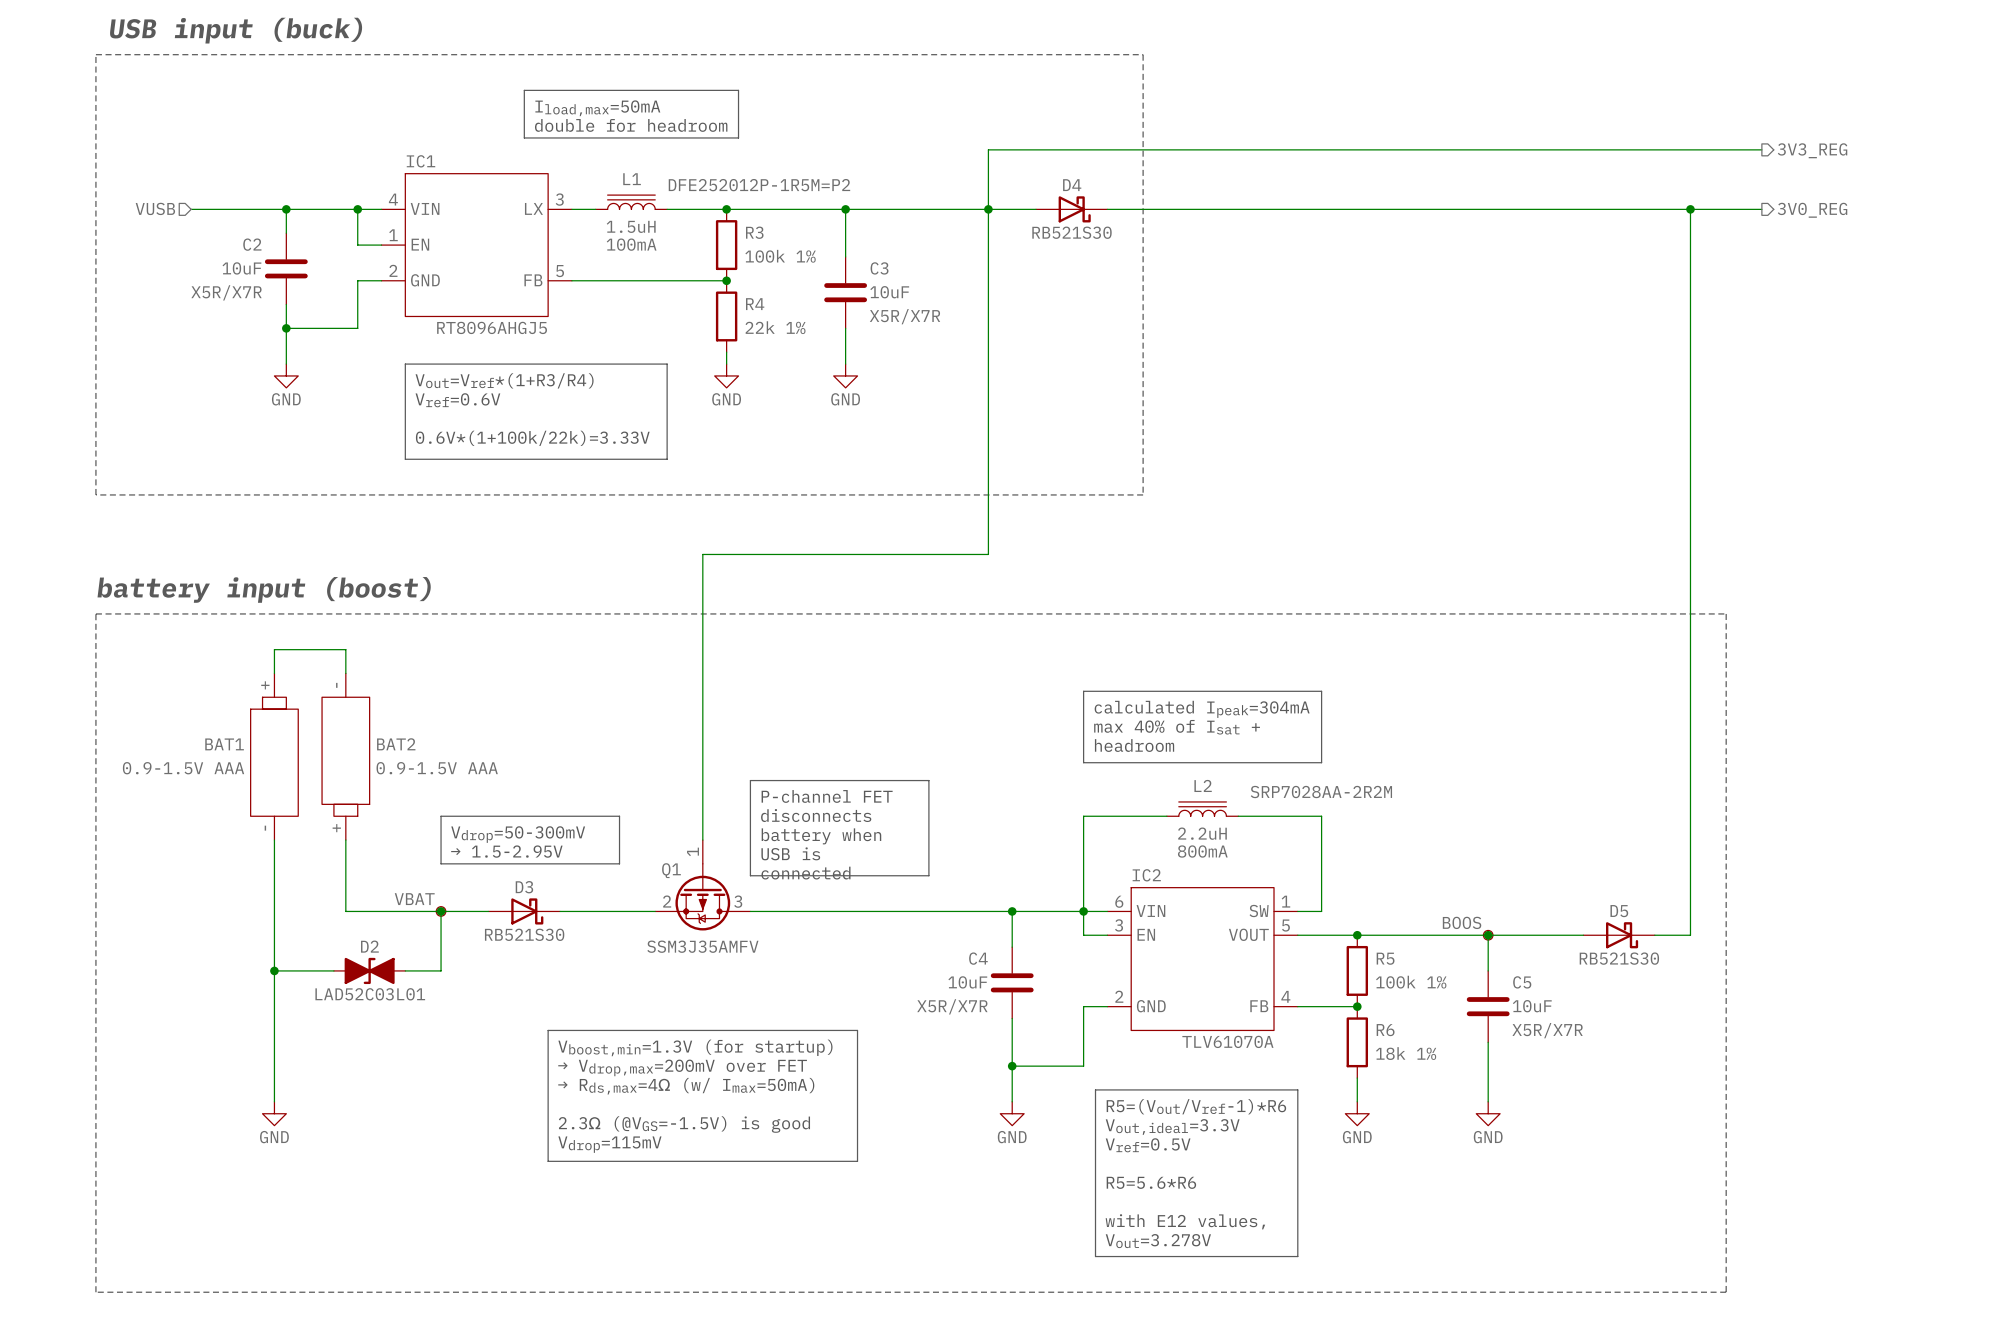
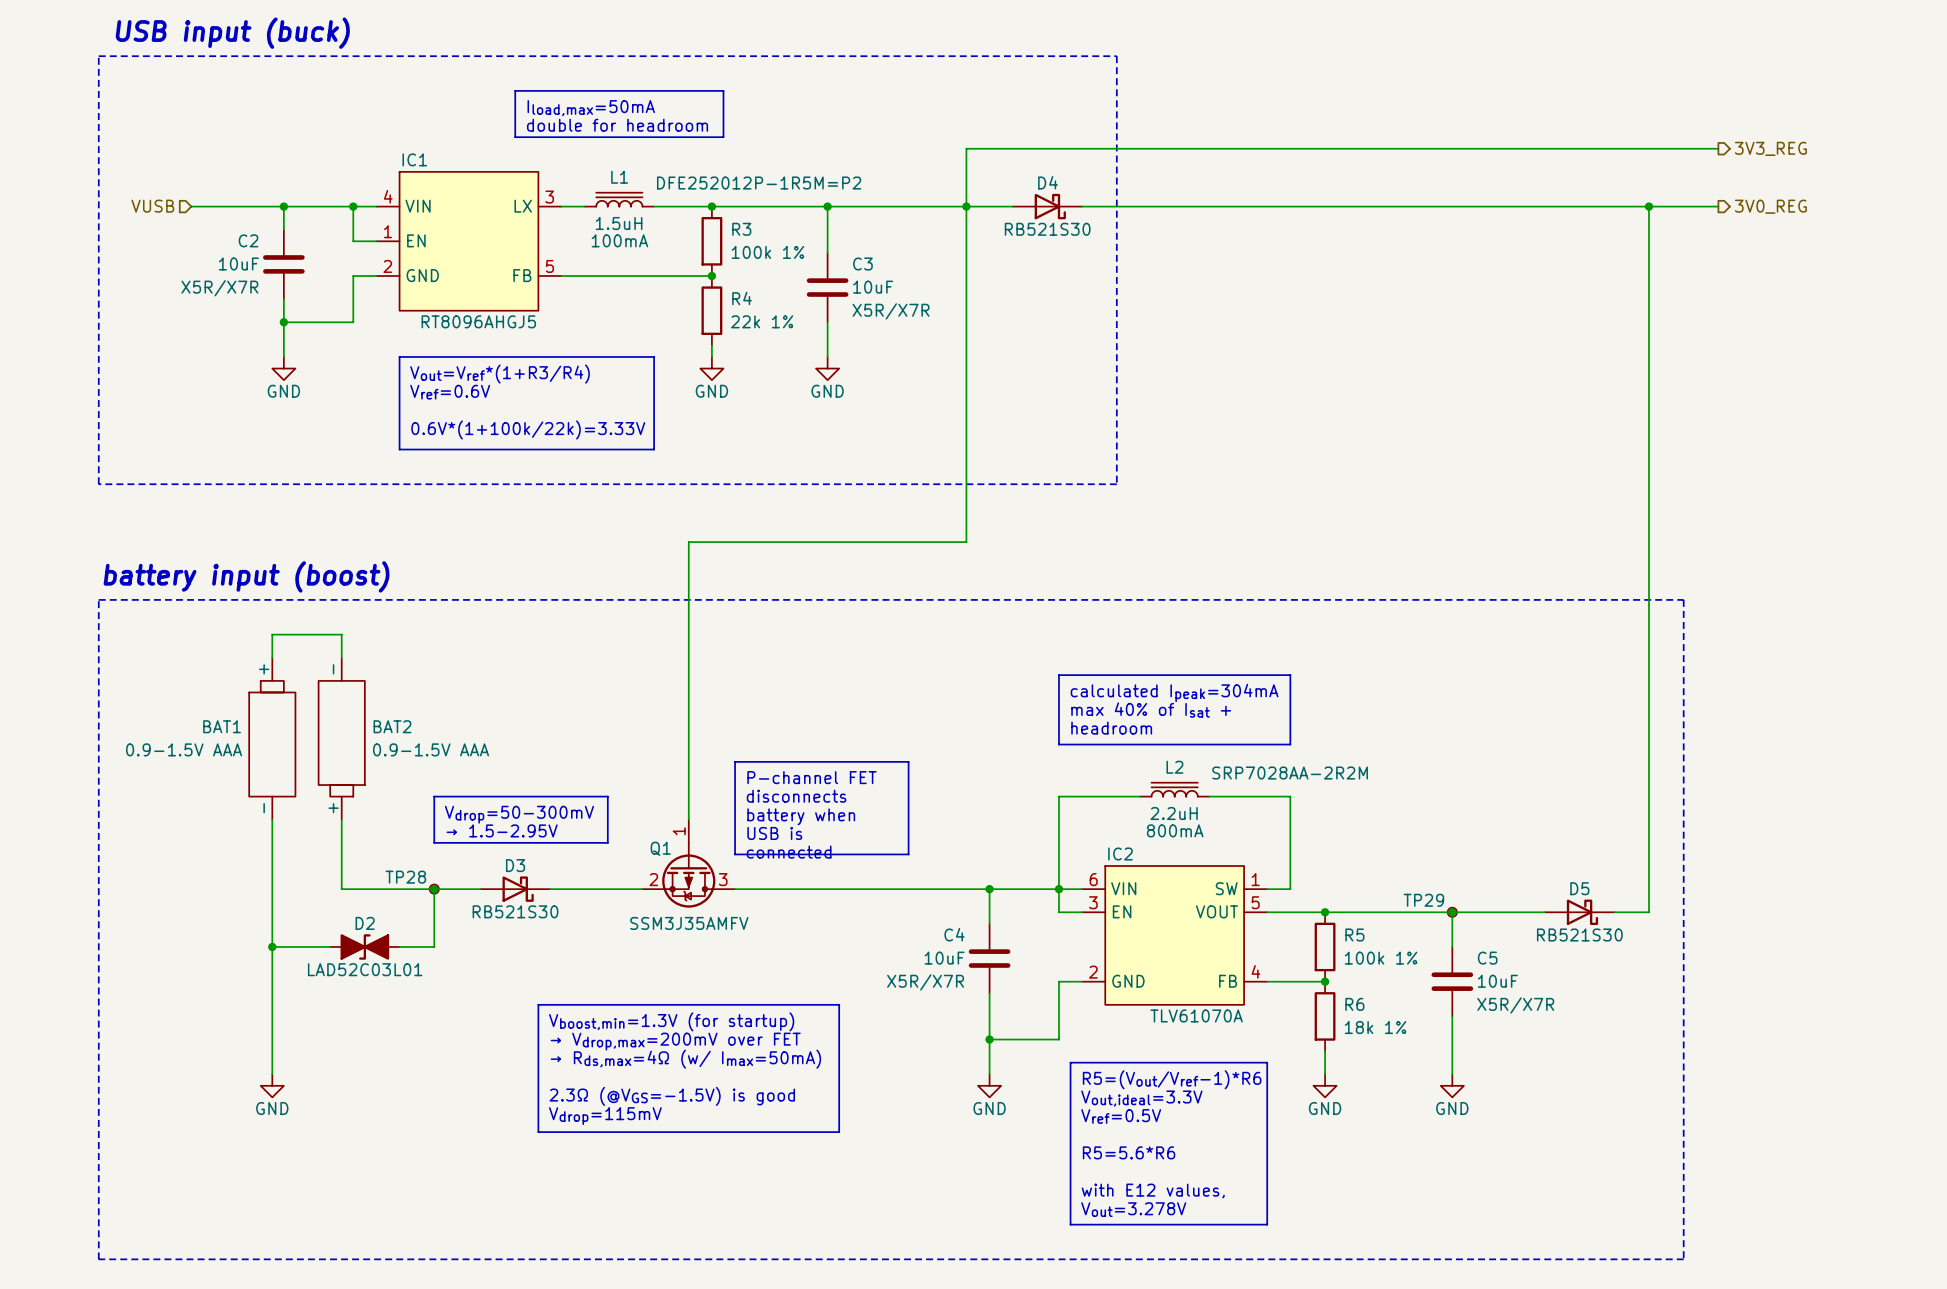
TP28 name: none -> TP28 (405, 877)
TP28 value: VBAT (414, 899) -> none
TP29 name: none -> TP29 (1423, 900)
TP29 value: BOOS (1462, 922) -> none

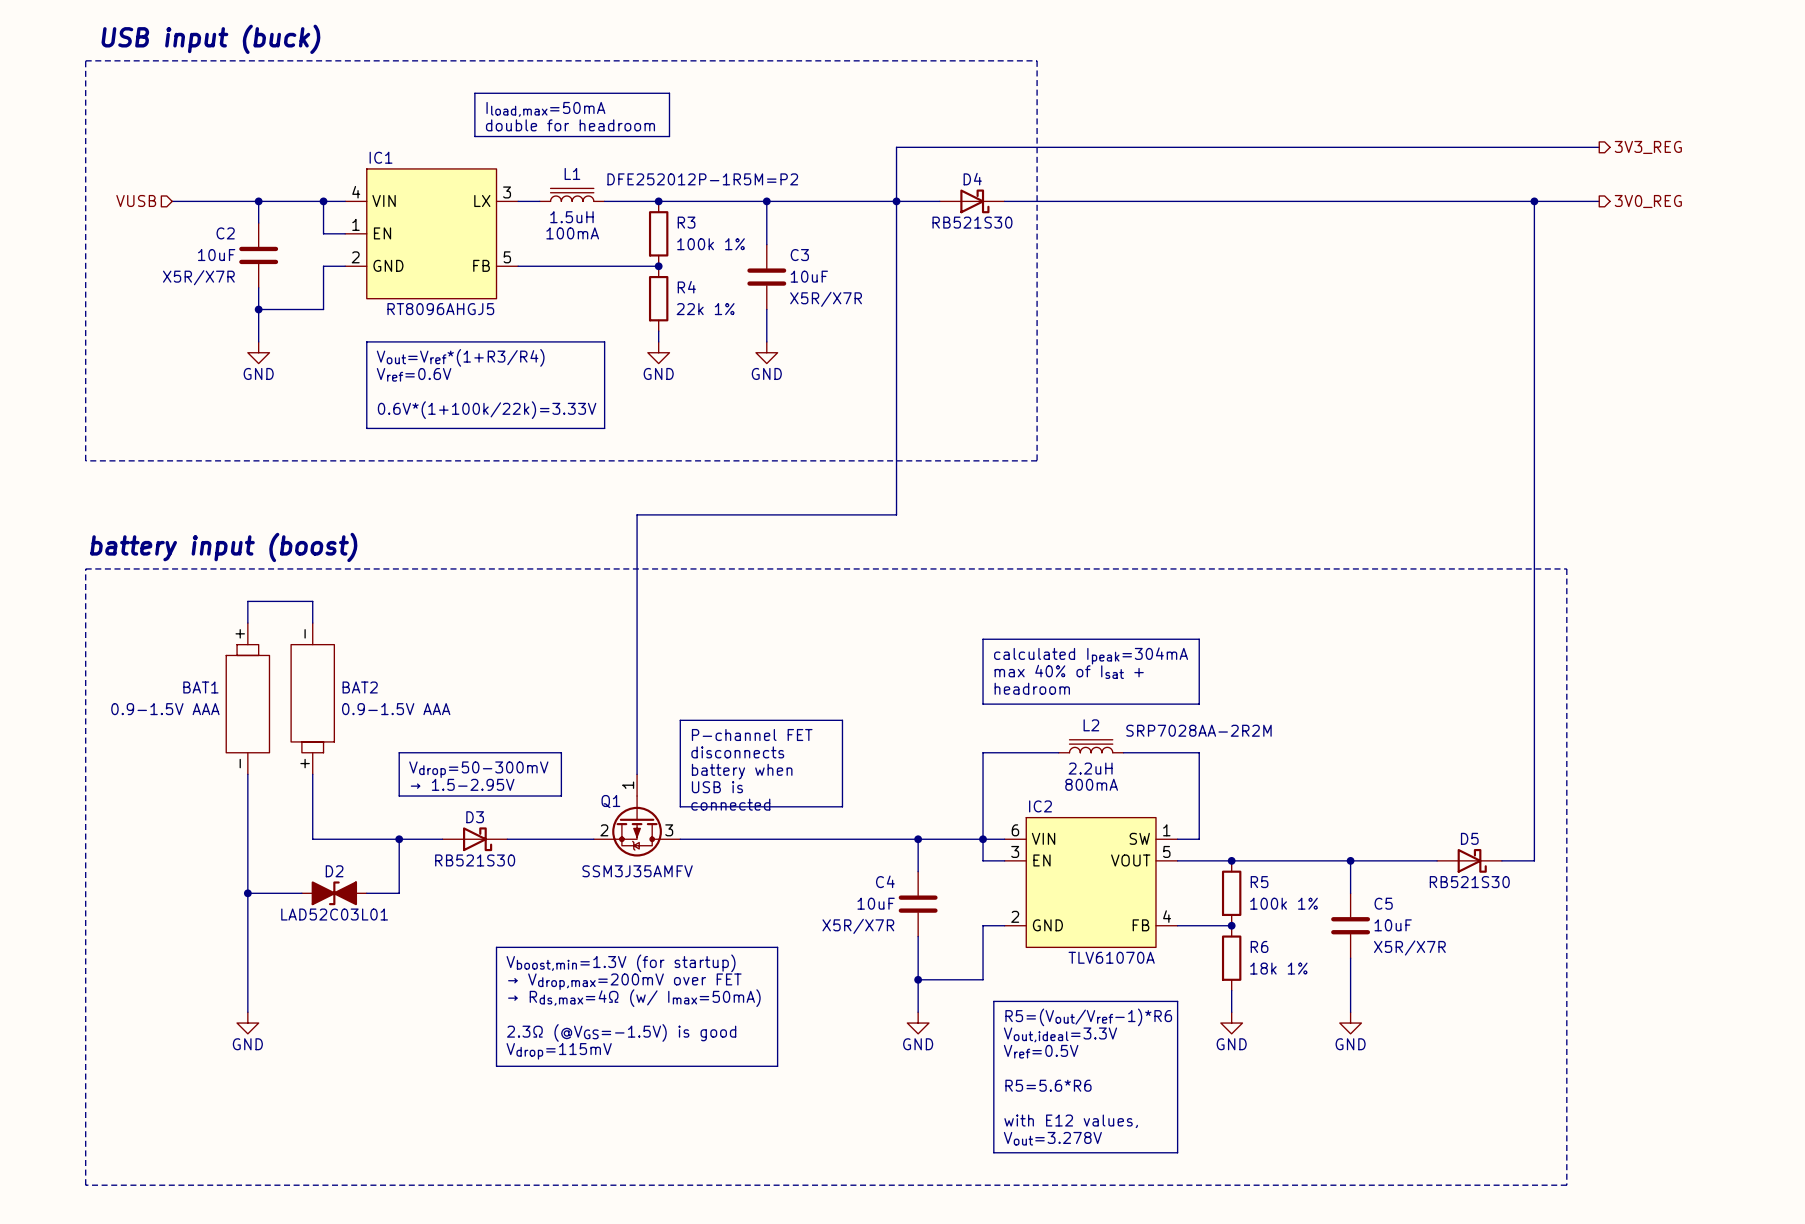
TP28: (434, 889) -> none
TP29: (1452, 912) -> none

